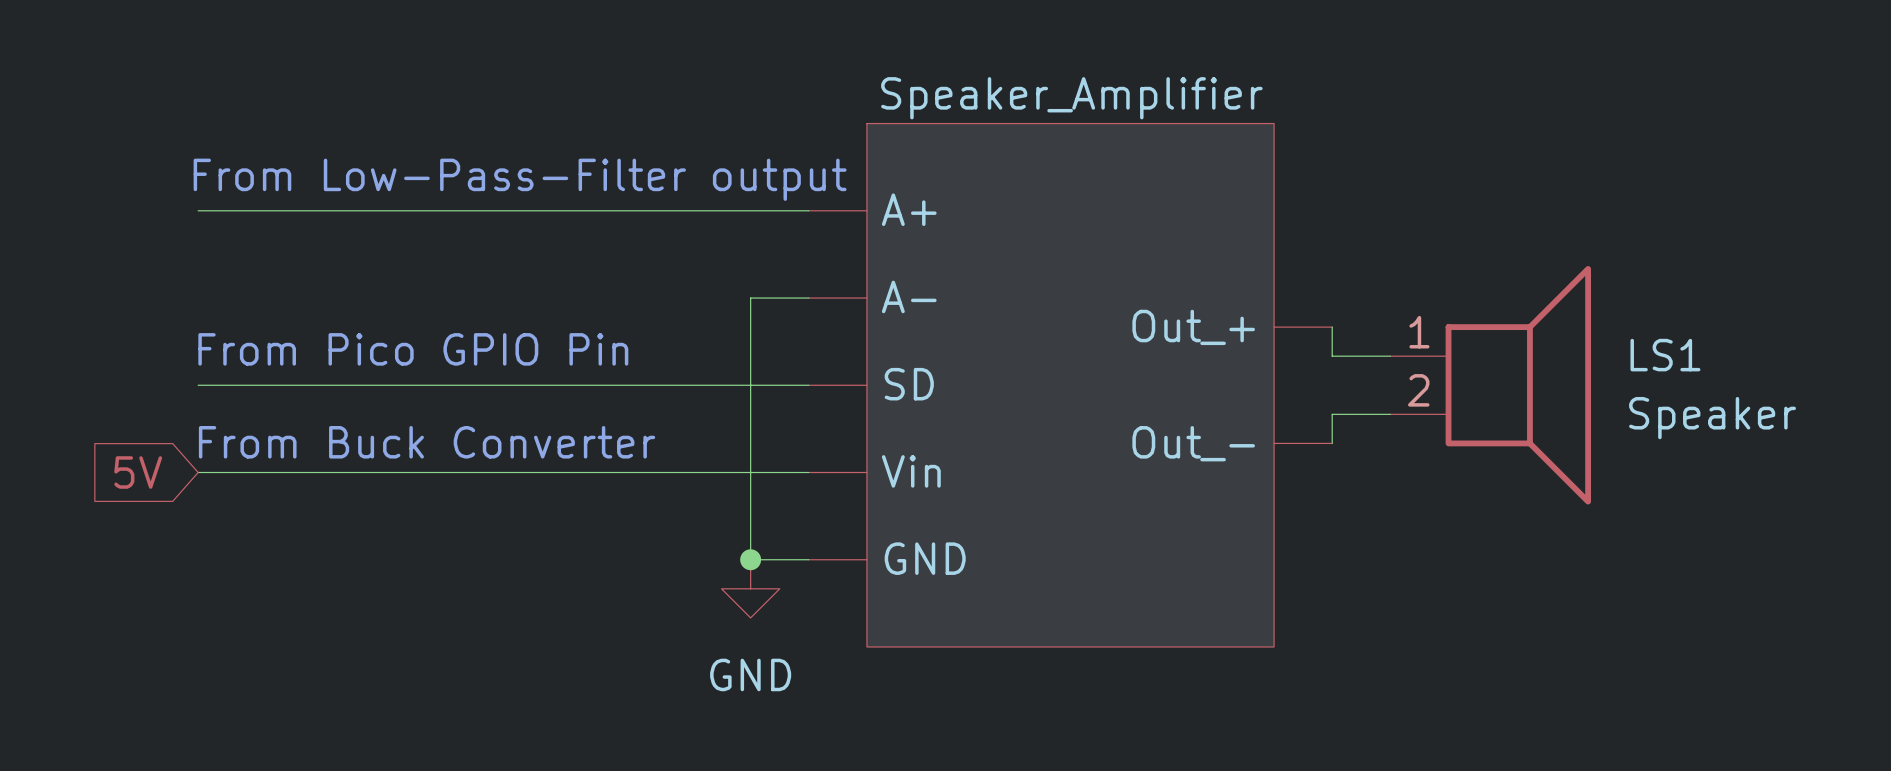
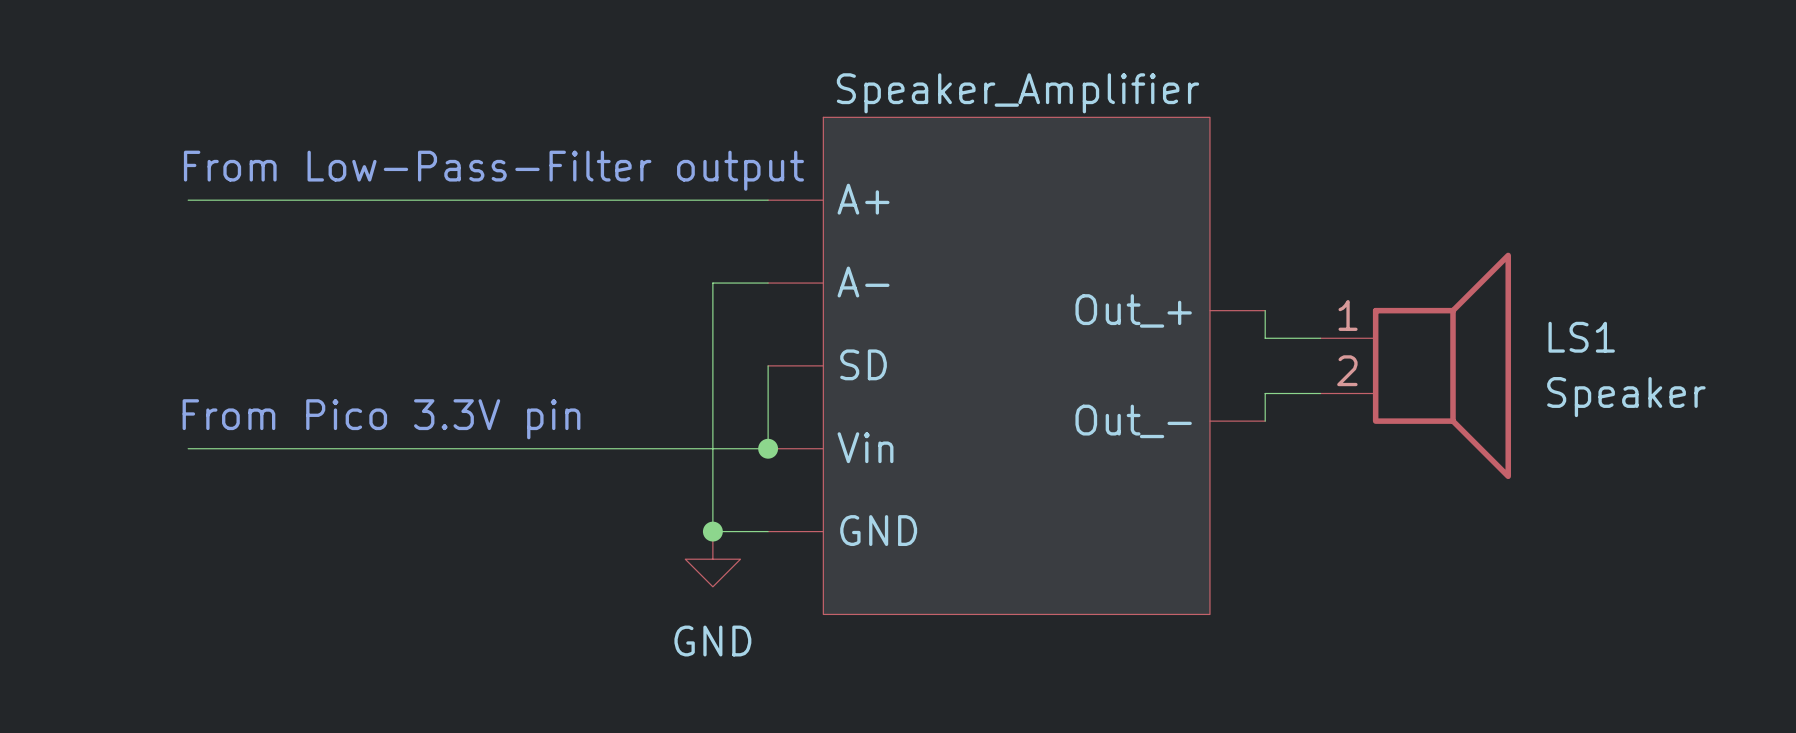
text: From Pico GPIO Pin (413, 349) -> none
wire: (198, 385) (808, 385) -> (768, 448) (768, 365)
text: none -> From Pico 3.3V pin (381, 419)
text: From Buck Converter (427, 442) -> none
global label: 5V (138, 472) -> none
junction: none -> (768, 448)

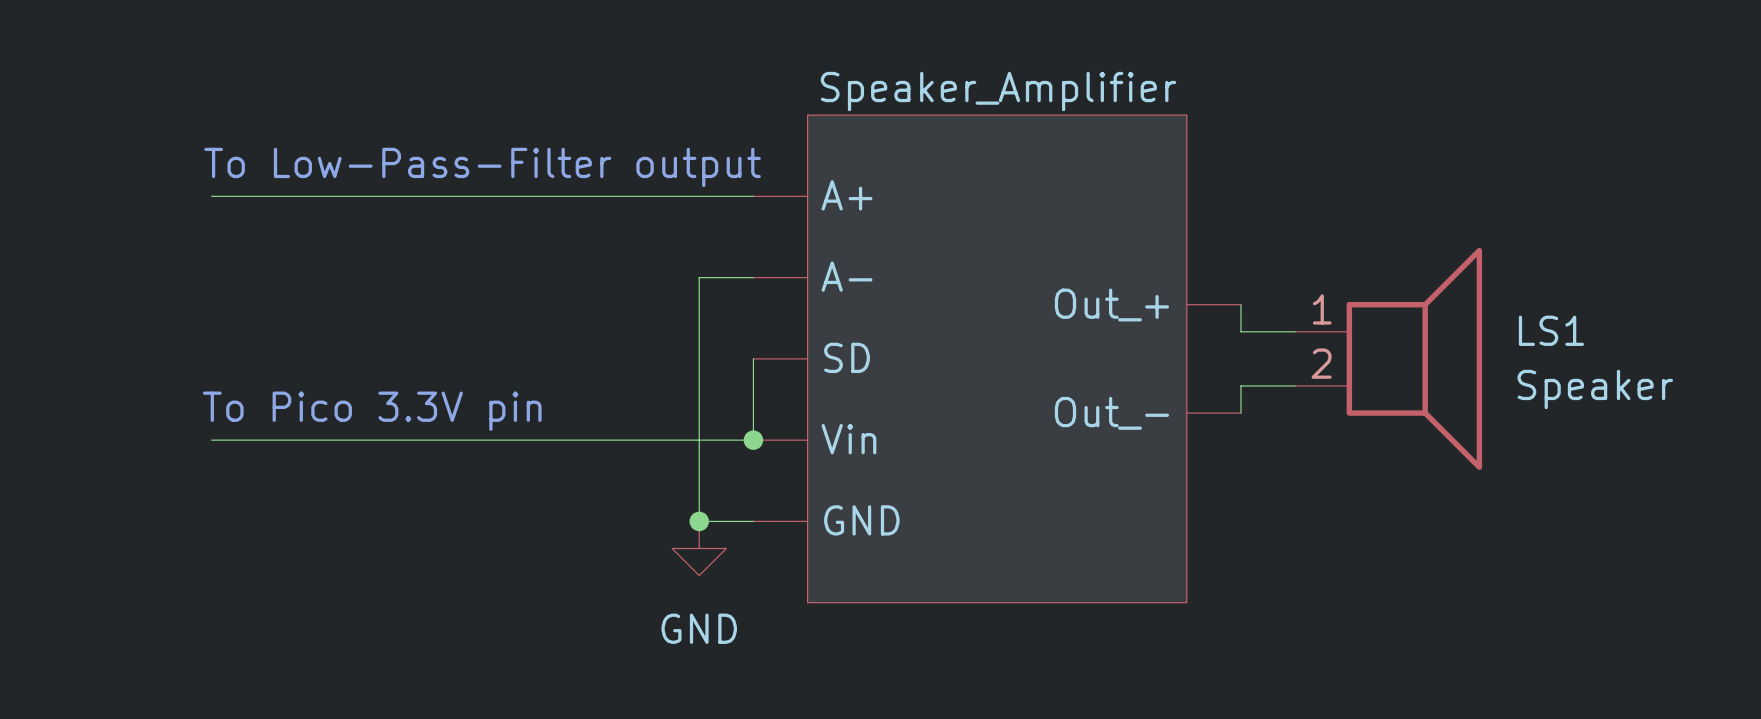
text: From Low-Pass-Filter output (493, 170) -> To Low-Pass-Filter output (482, 167)
wire: (188, 200) (215, 200) -> none
text: From Pico 3.3V pin (381, 419) -> To Pico 3.3V pin (372, 411)
wire: (188, 448) (215, 448) -> none

